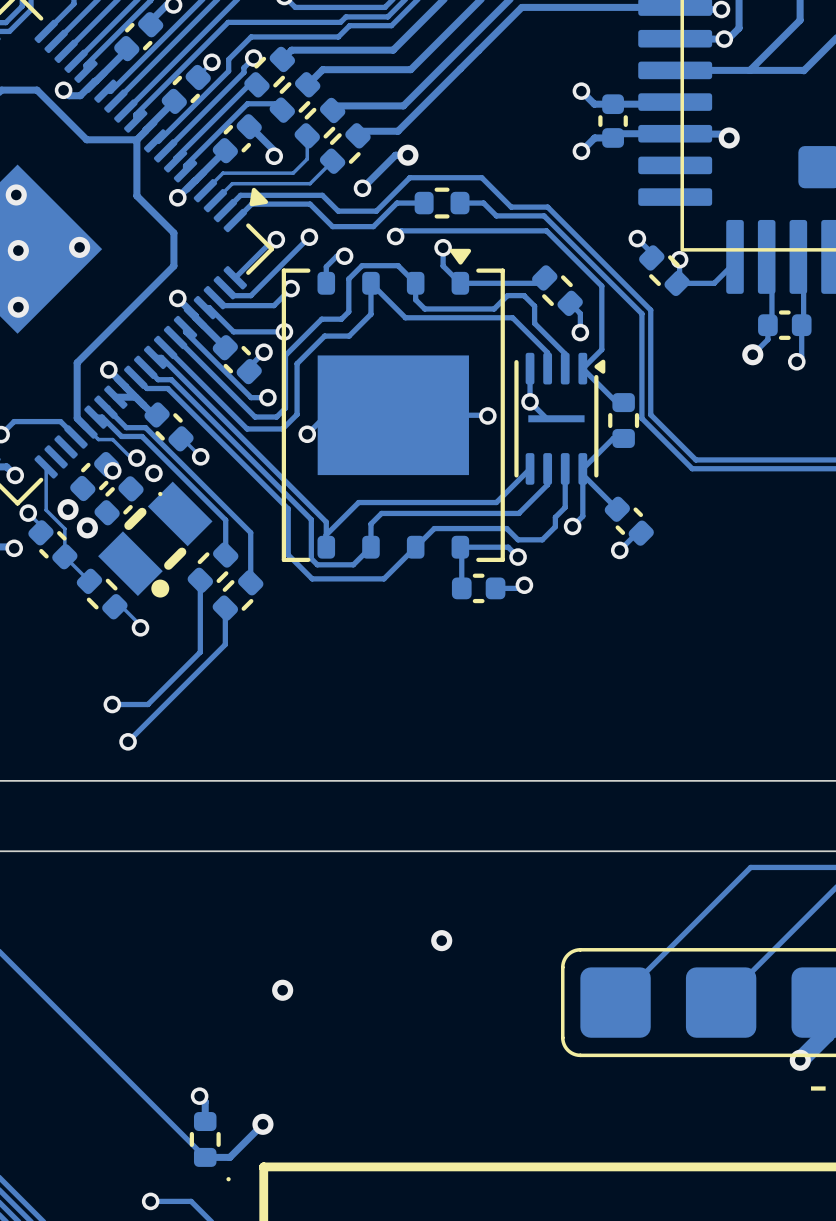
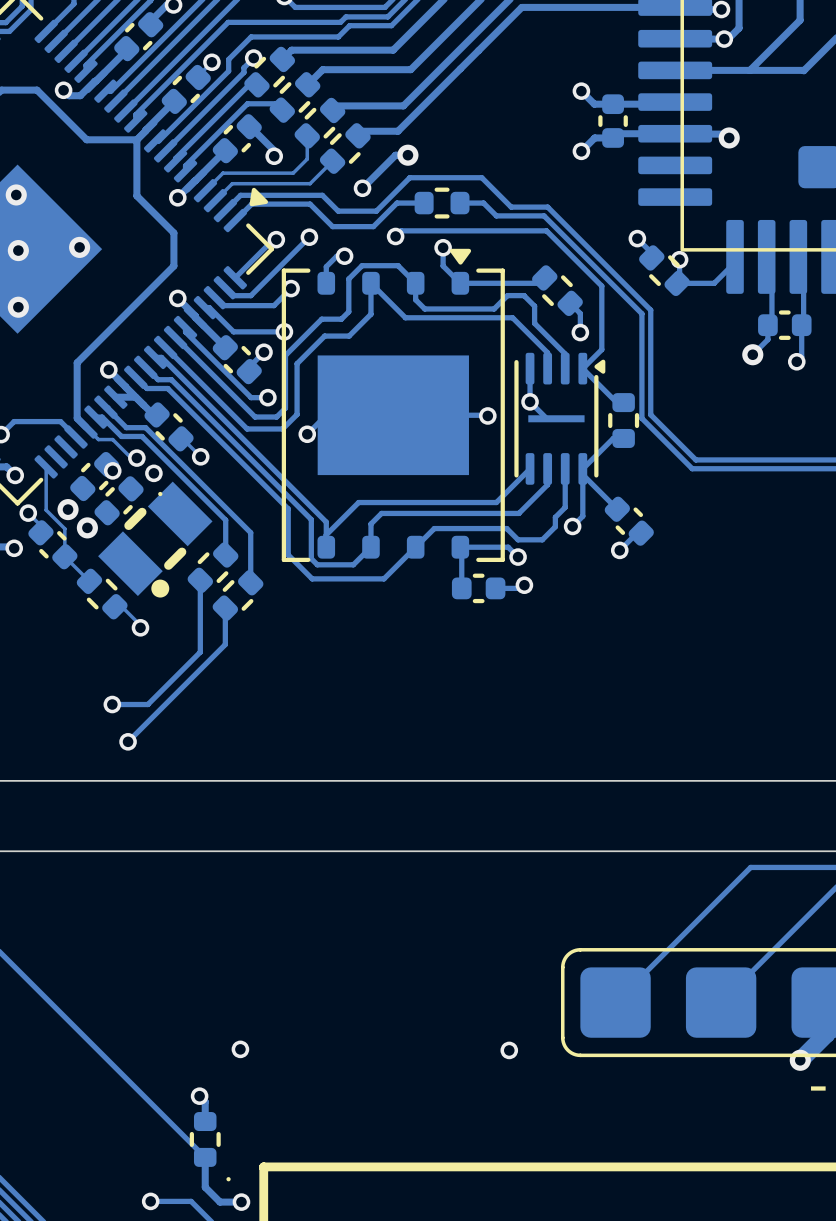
via: (441, 940) -> none
via: (282, 990) -> none
via: none -> (240, 1049)
via: none -> (509, 1050)
track: (262, 1124) (229, 1157) (205, 1157) -> (241, 1202) (220, 1202) (205, 1187) (205, 1157)
via: (262, 1124) -> none
via: none -> (241, 1202)

